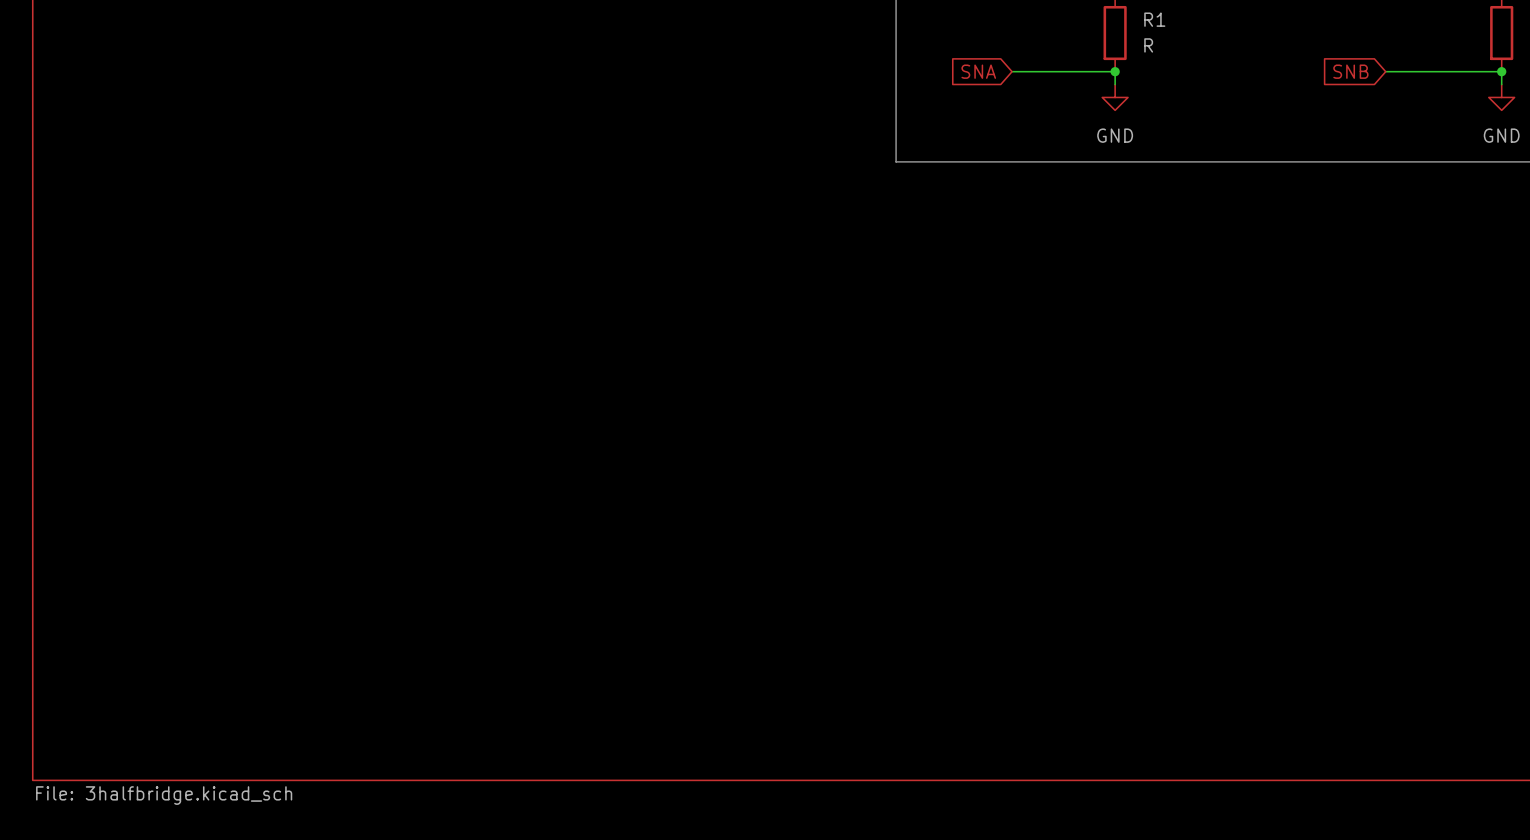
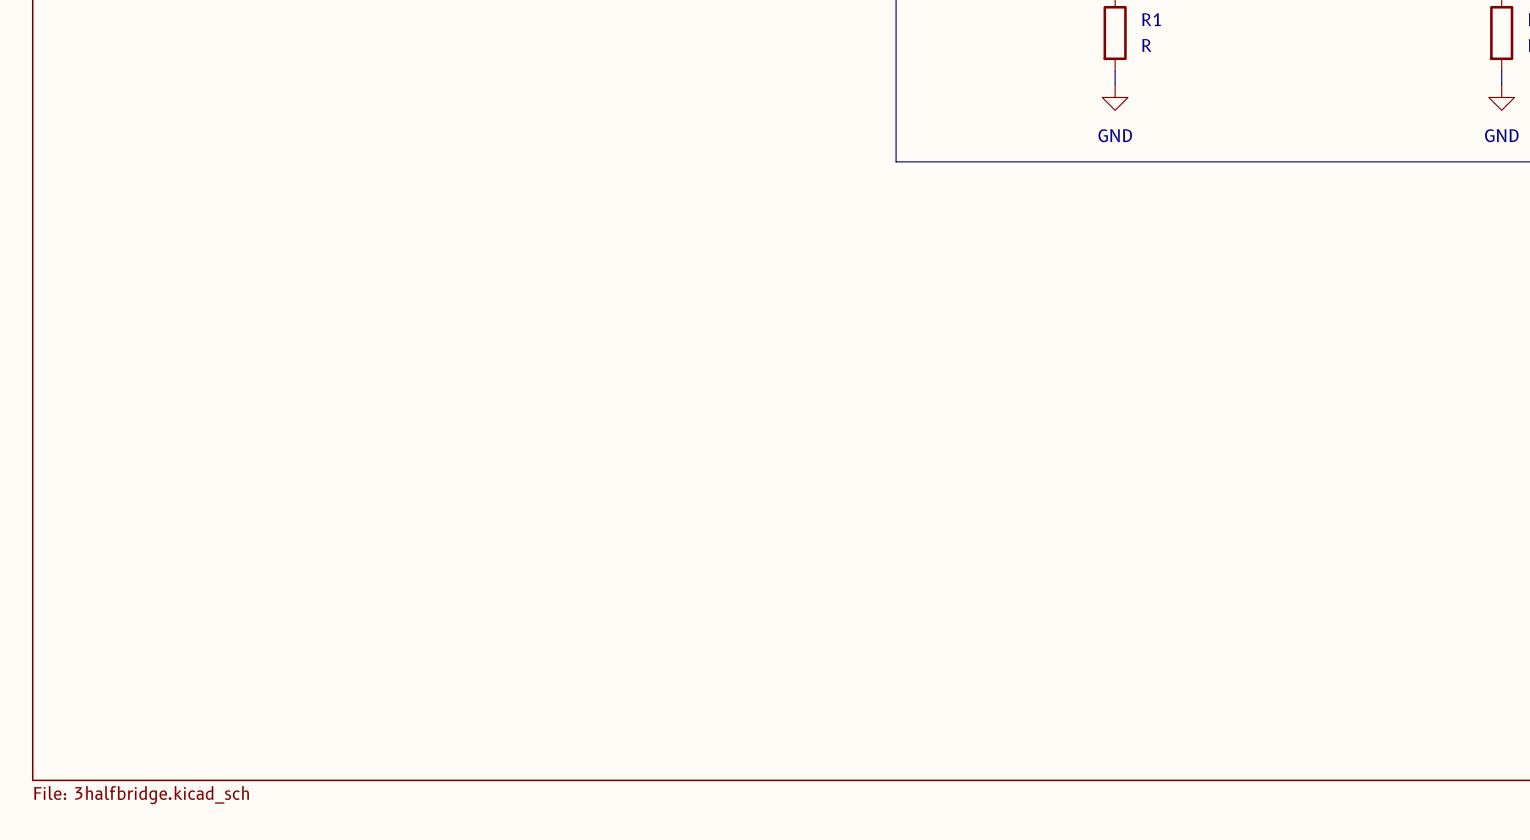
global label: SNA (978, 71) -> none
wire: (1012, 71) (1115, 71) -> none
junction: (1115, 71) -> none
global label: SNB (1350, 71) -> none
wire: (1385, 71) (1501, 71) -> none
junction: (1501, 71) -> none

